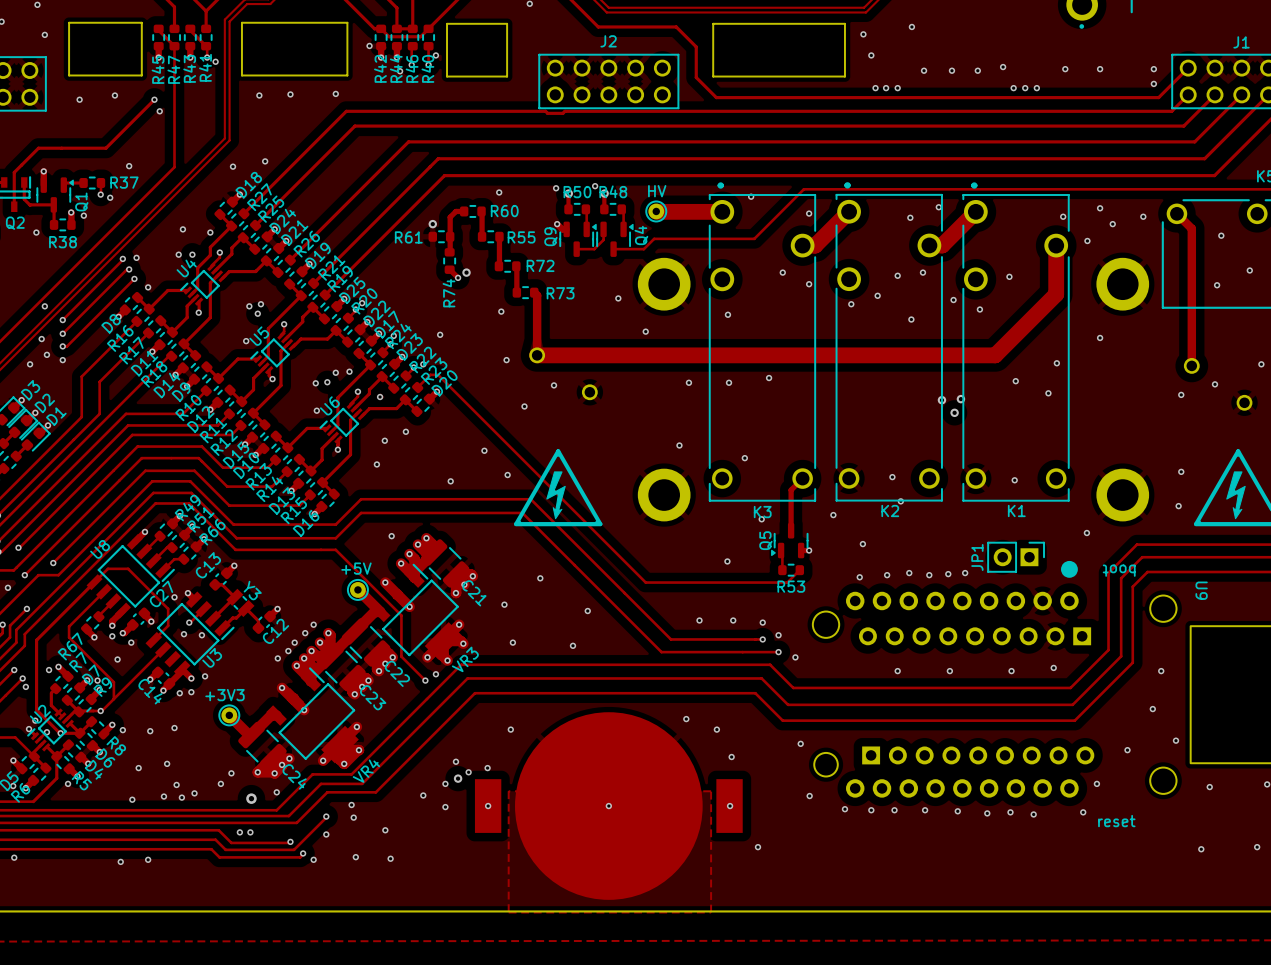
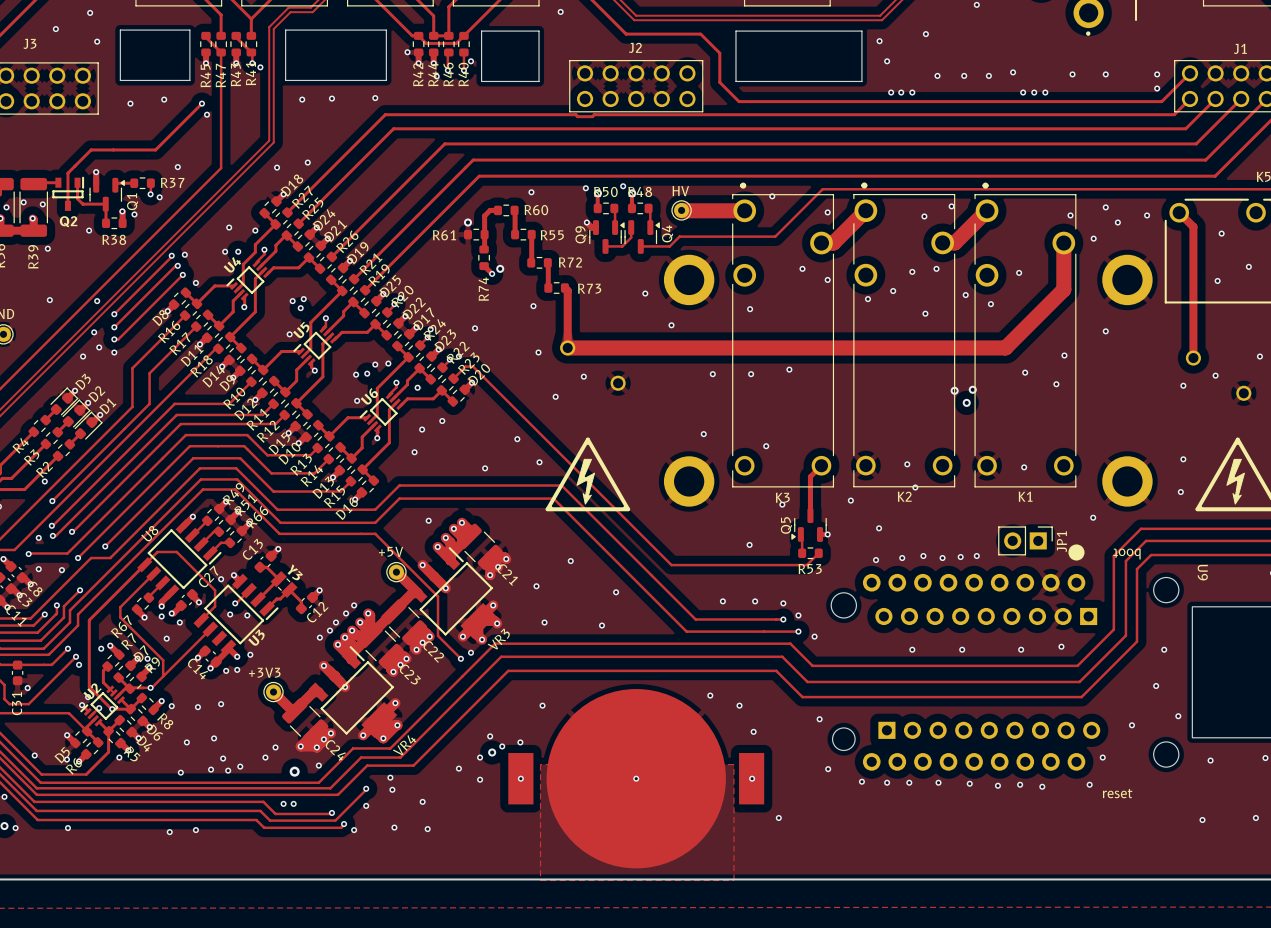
JP1 name position: JP1 (977, 557) -> JP1 (1061, 541)

